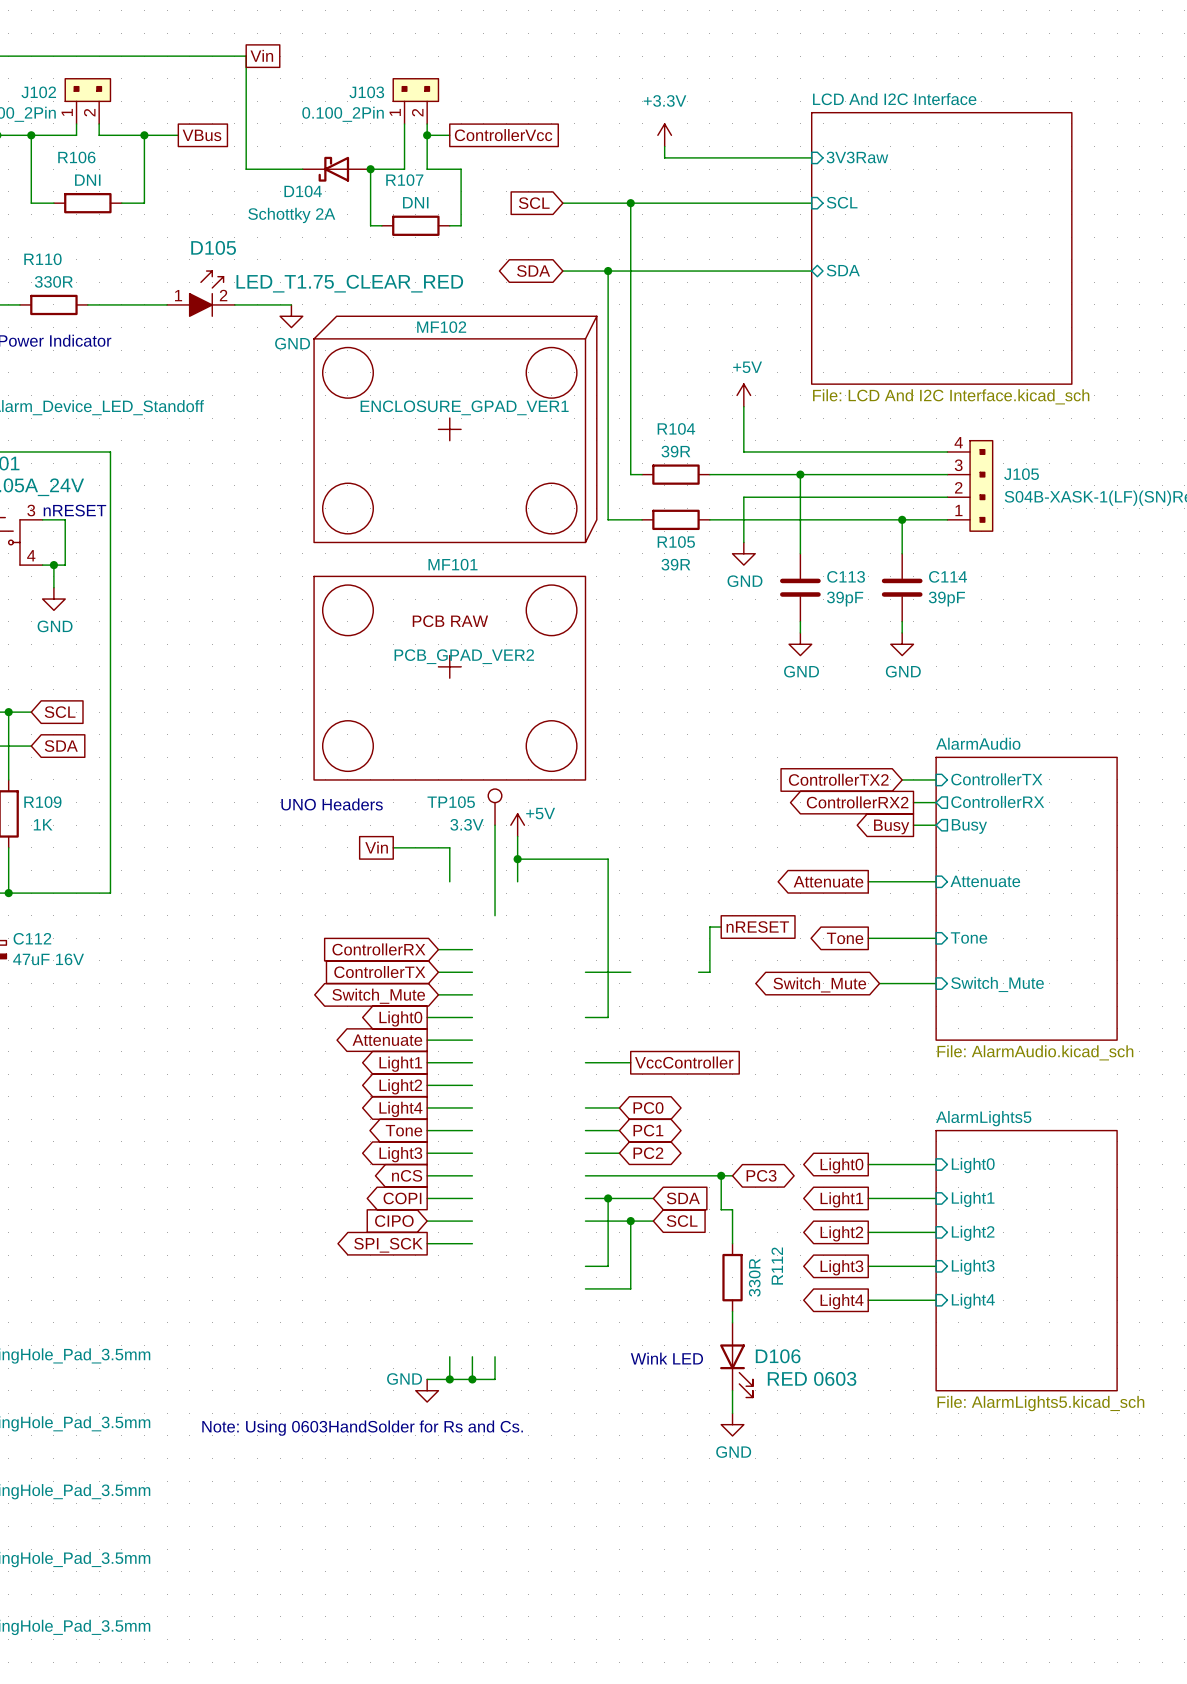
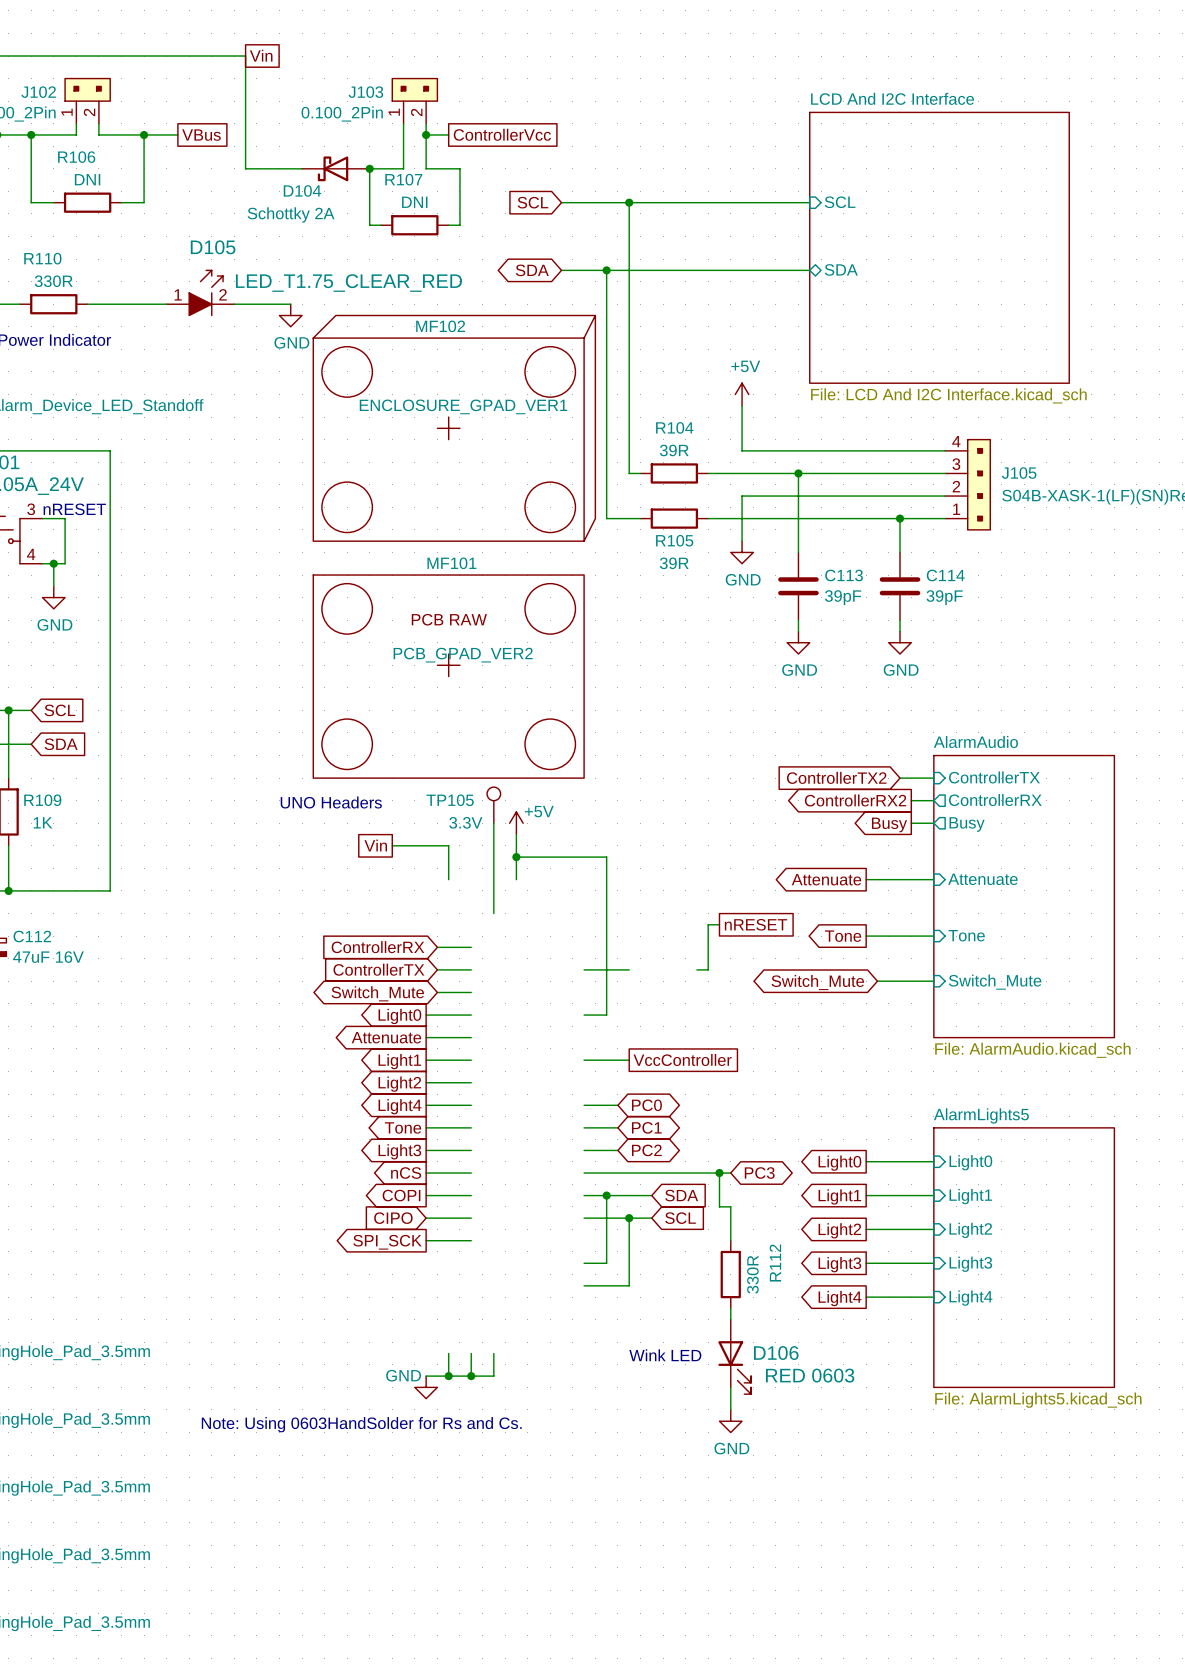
power symbol: +3.3V (664, 135) -> none
wire: (664, 146) (664, 157) (811, 157) -> none
sheet pin: 3V3Raw (857, 157) -> none

